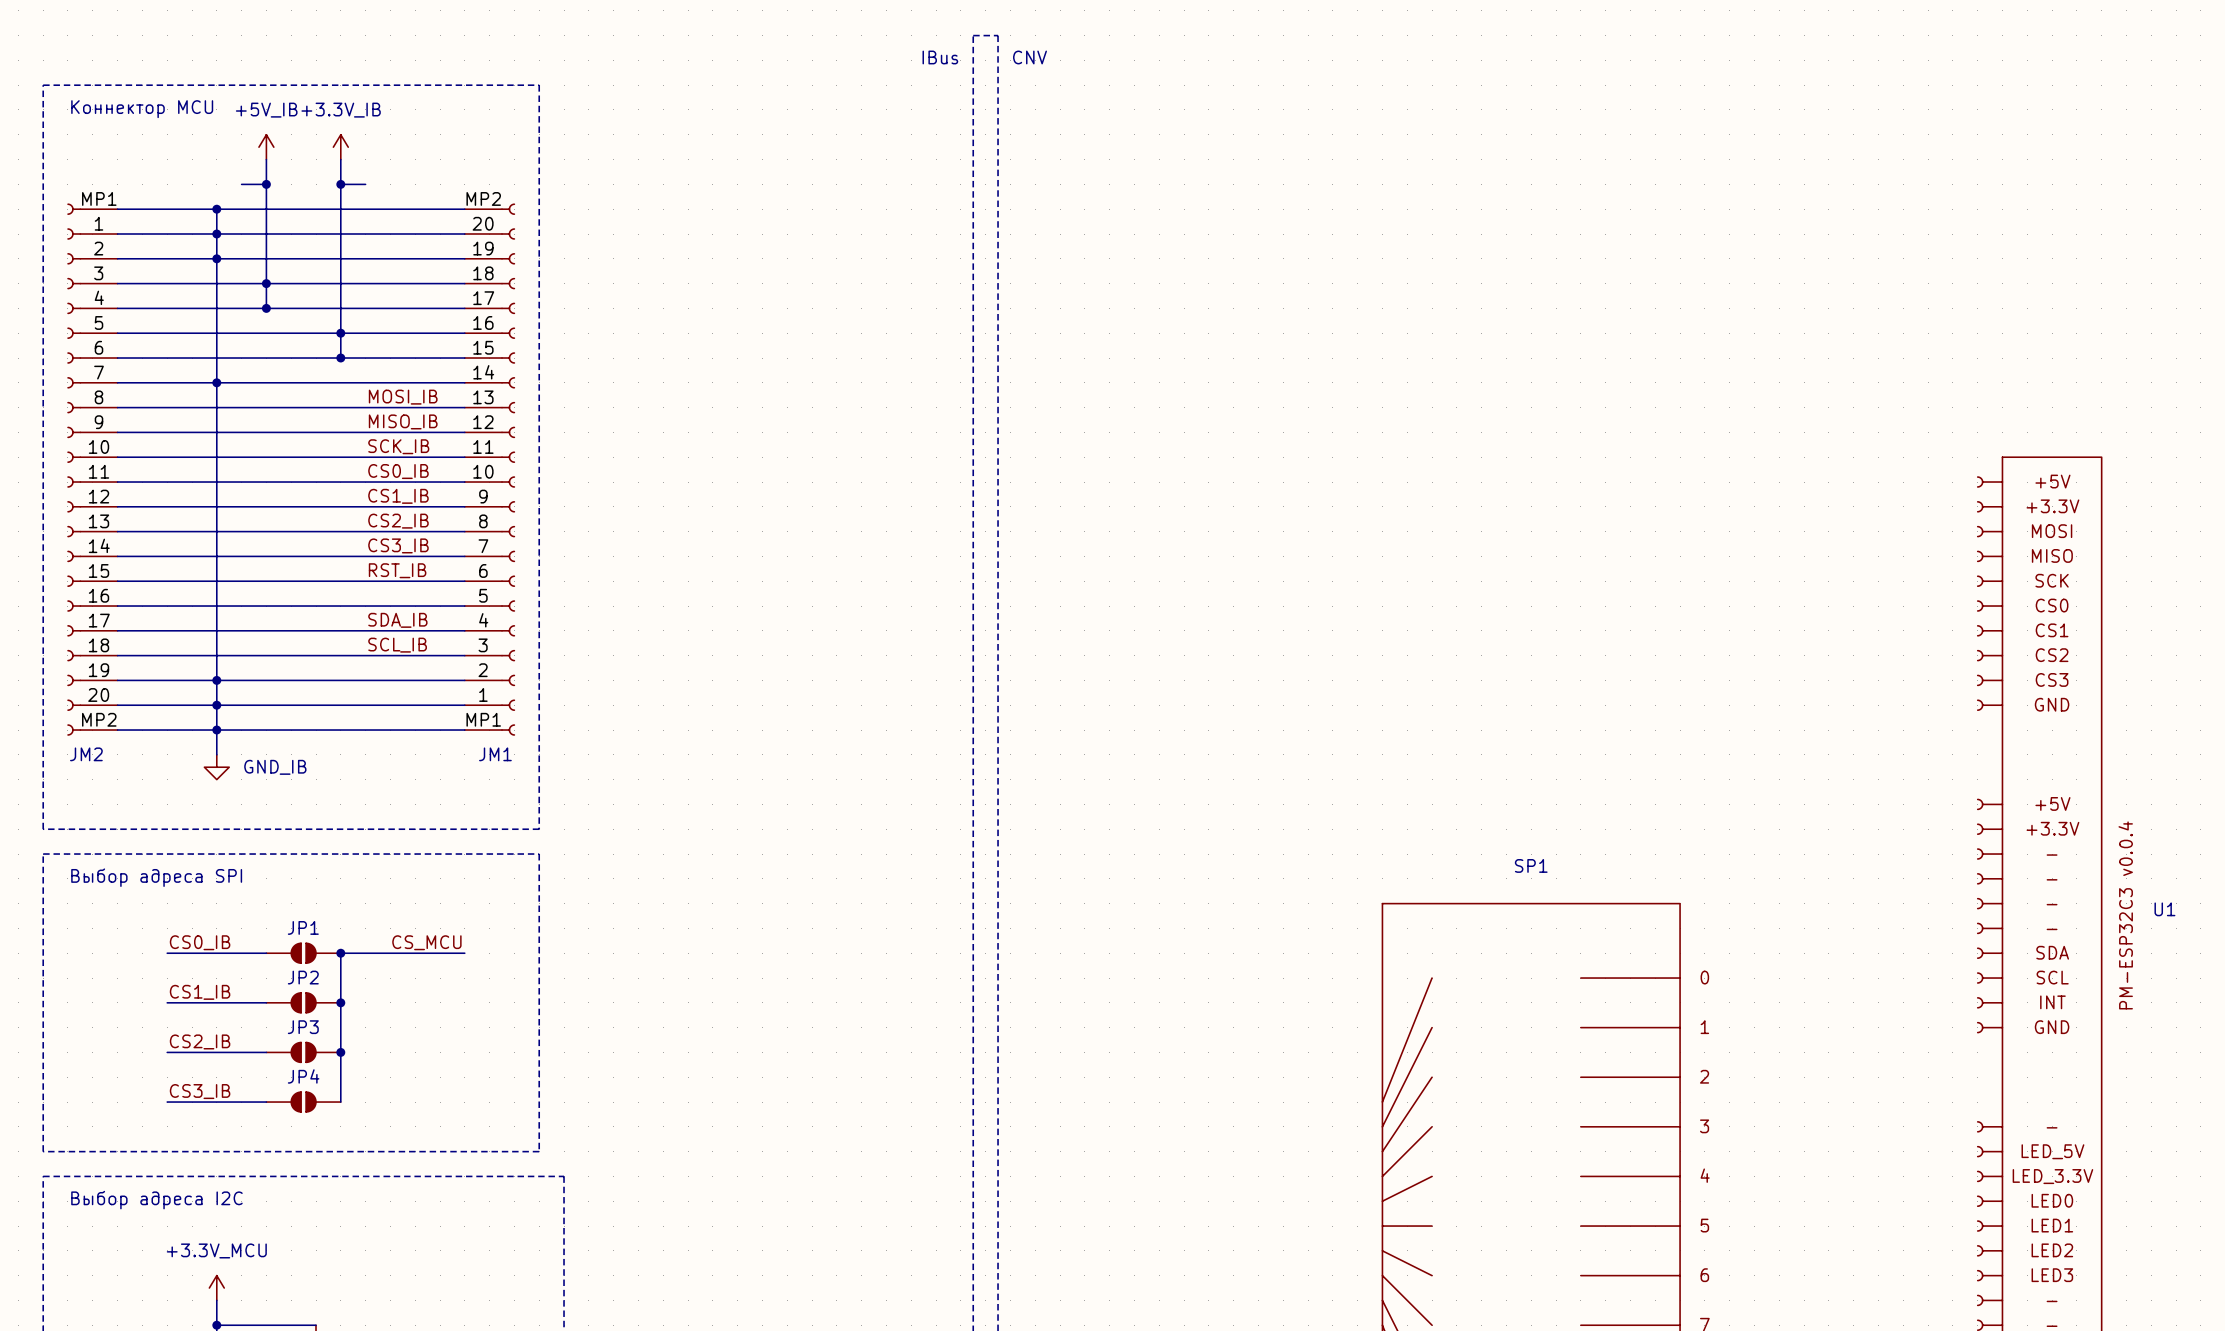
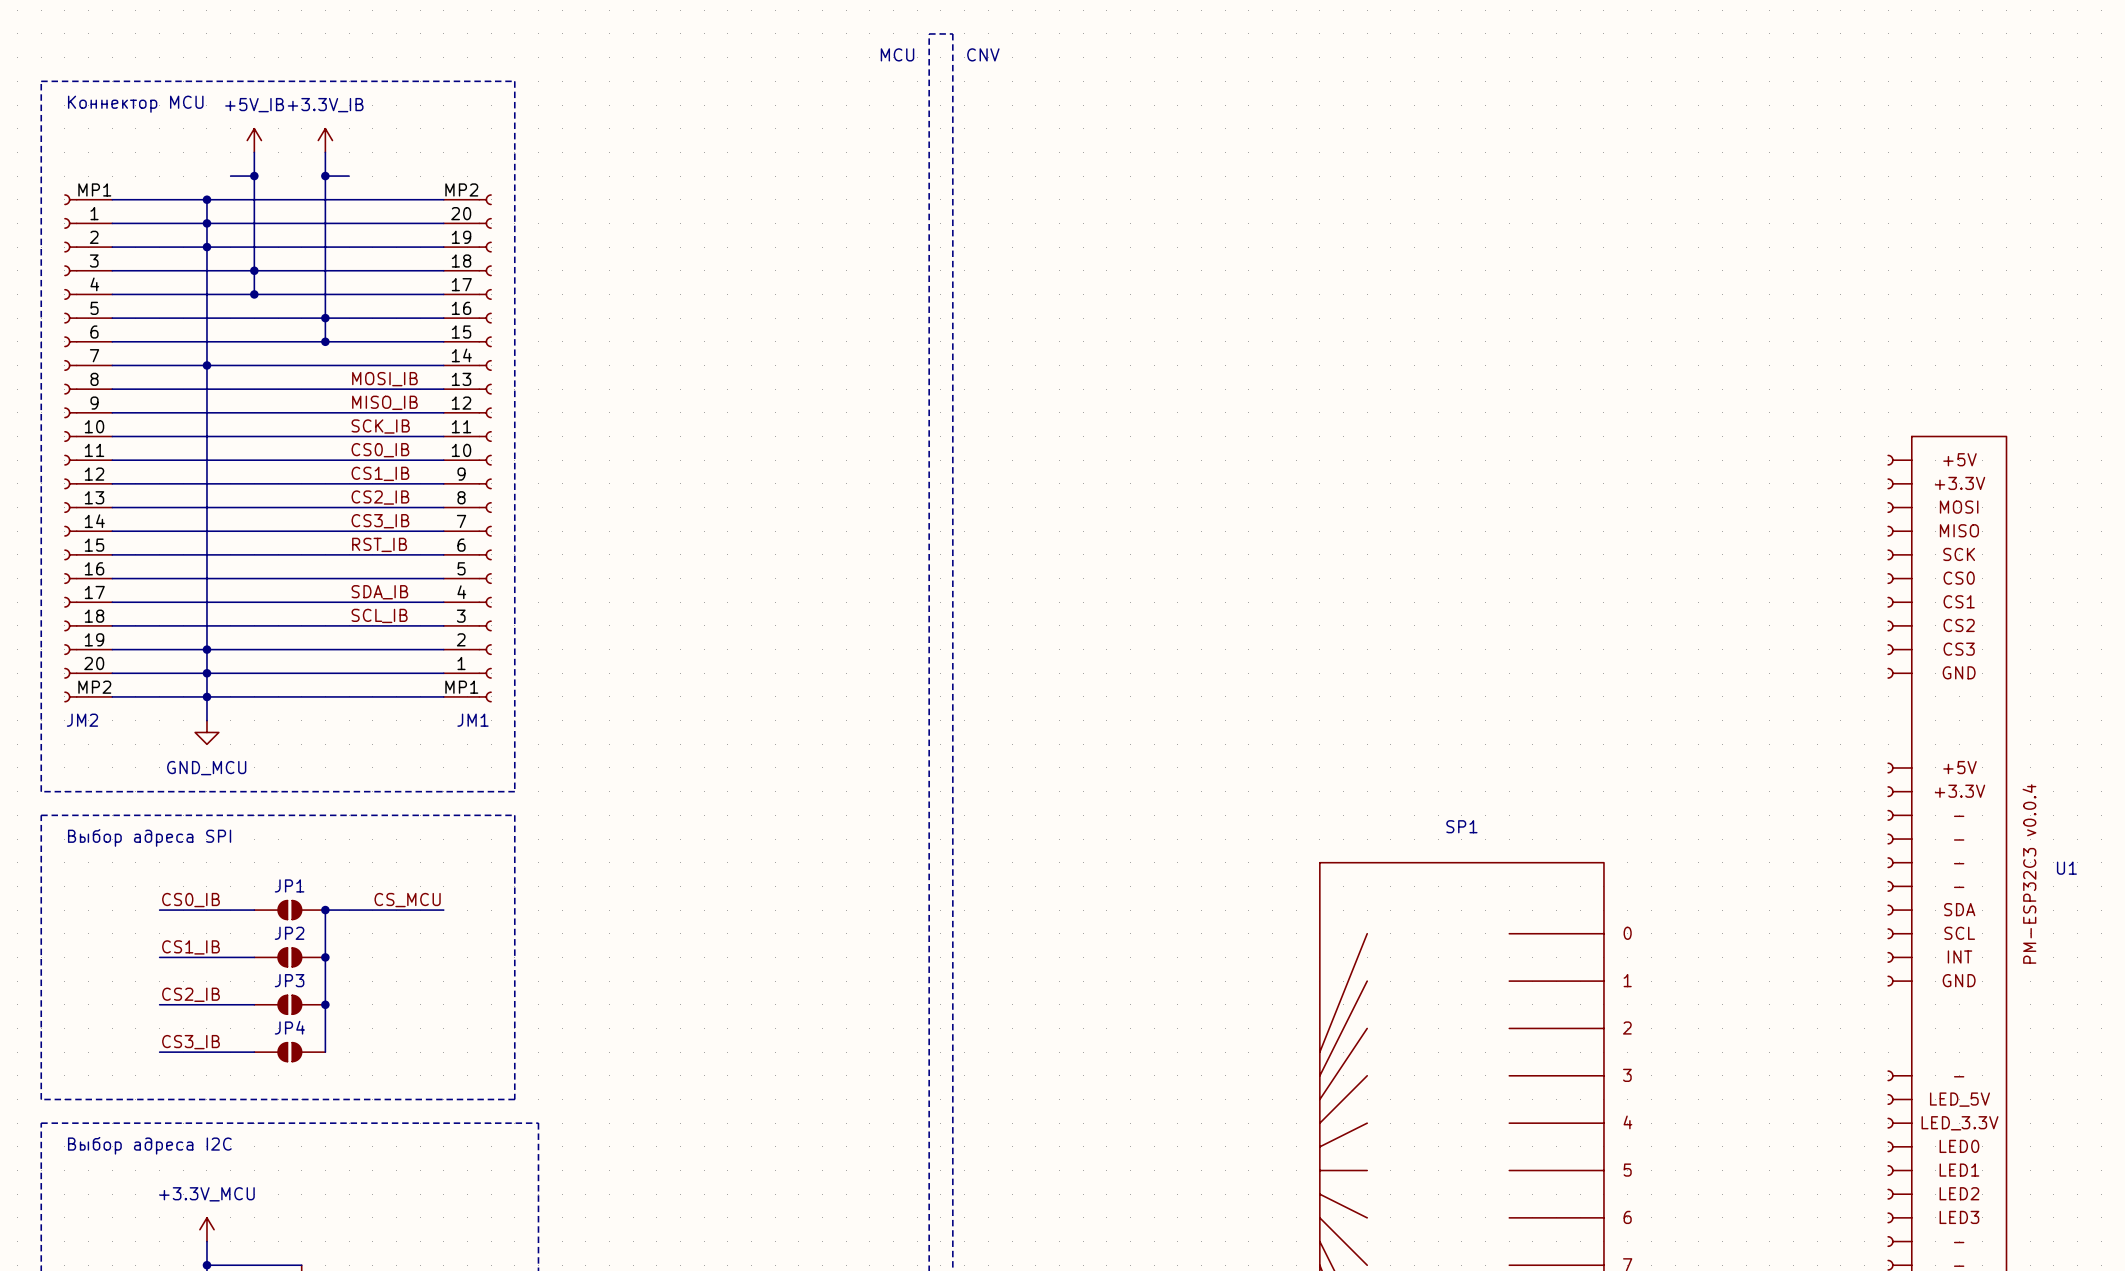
text: IBus (940, 57) -> MCU (897, 54)
power symbol: GND_IB (216, 767) -> GND_MCU (206, 732)

